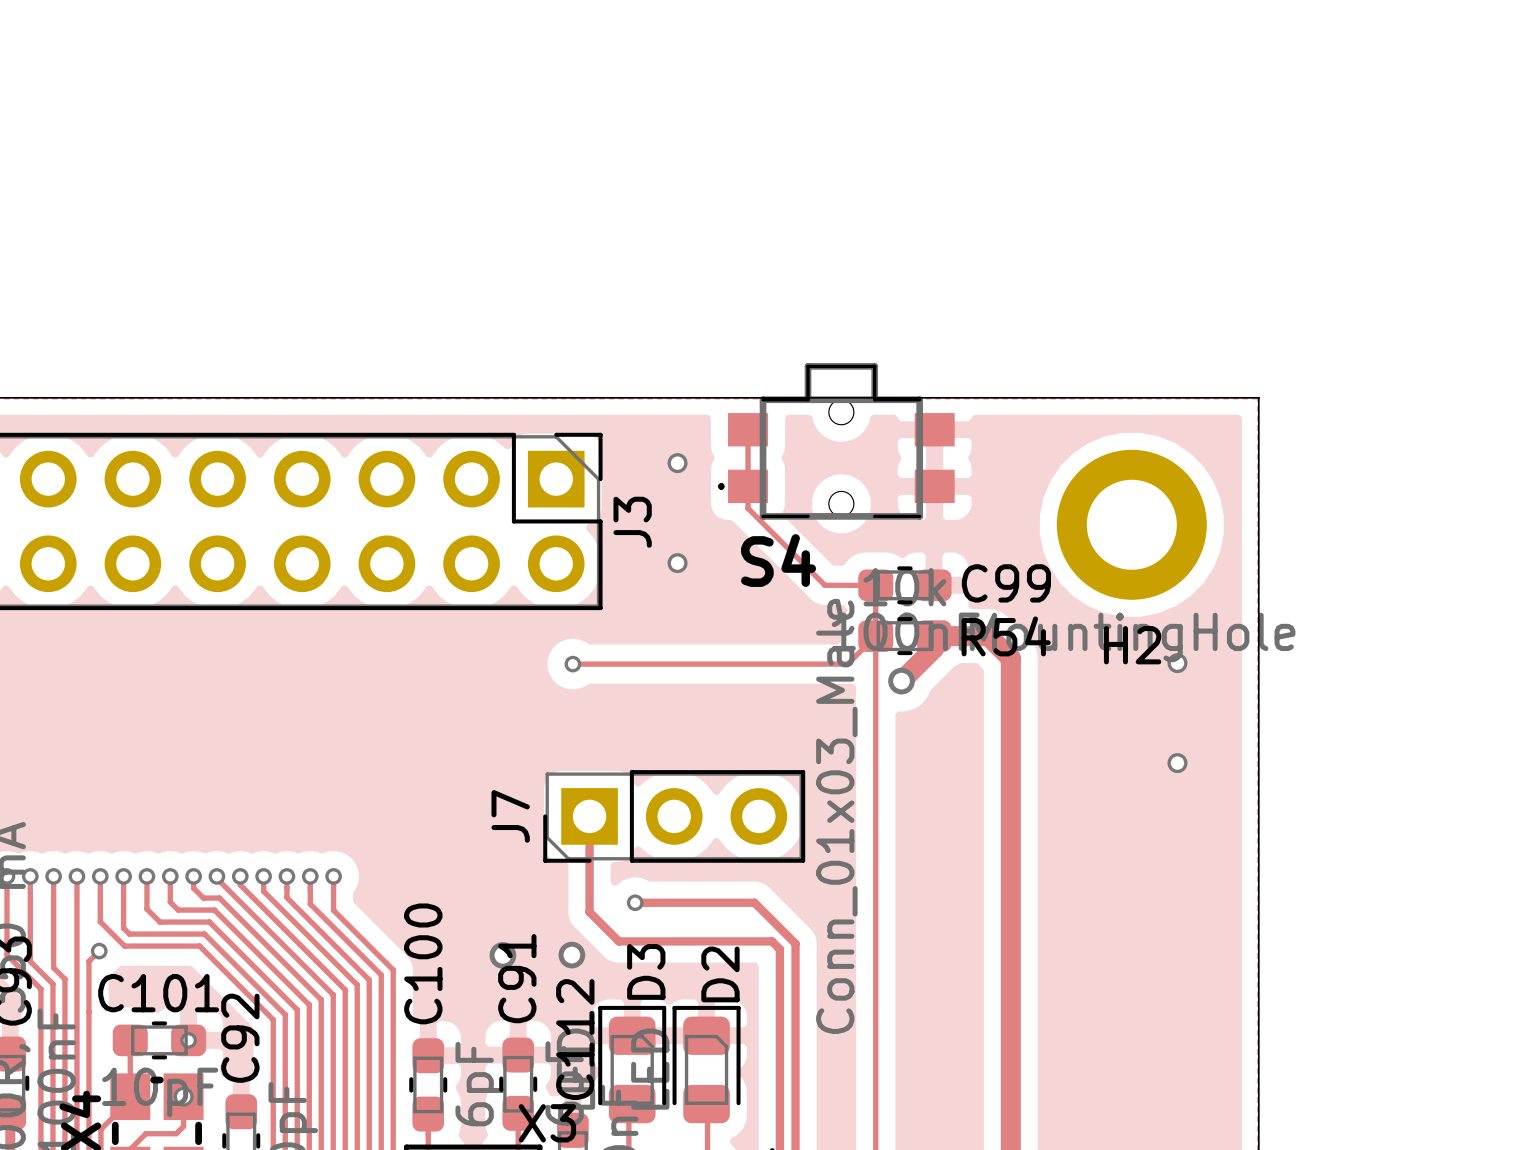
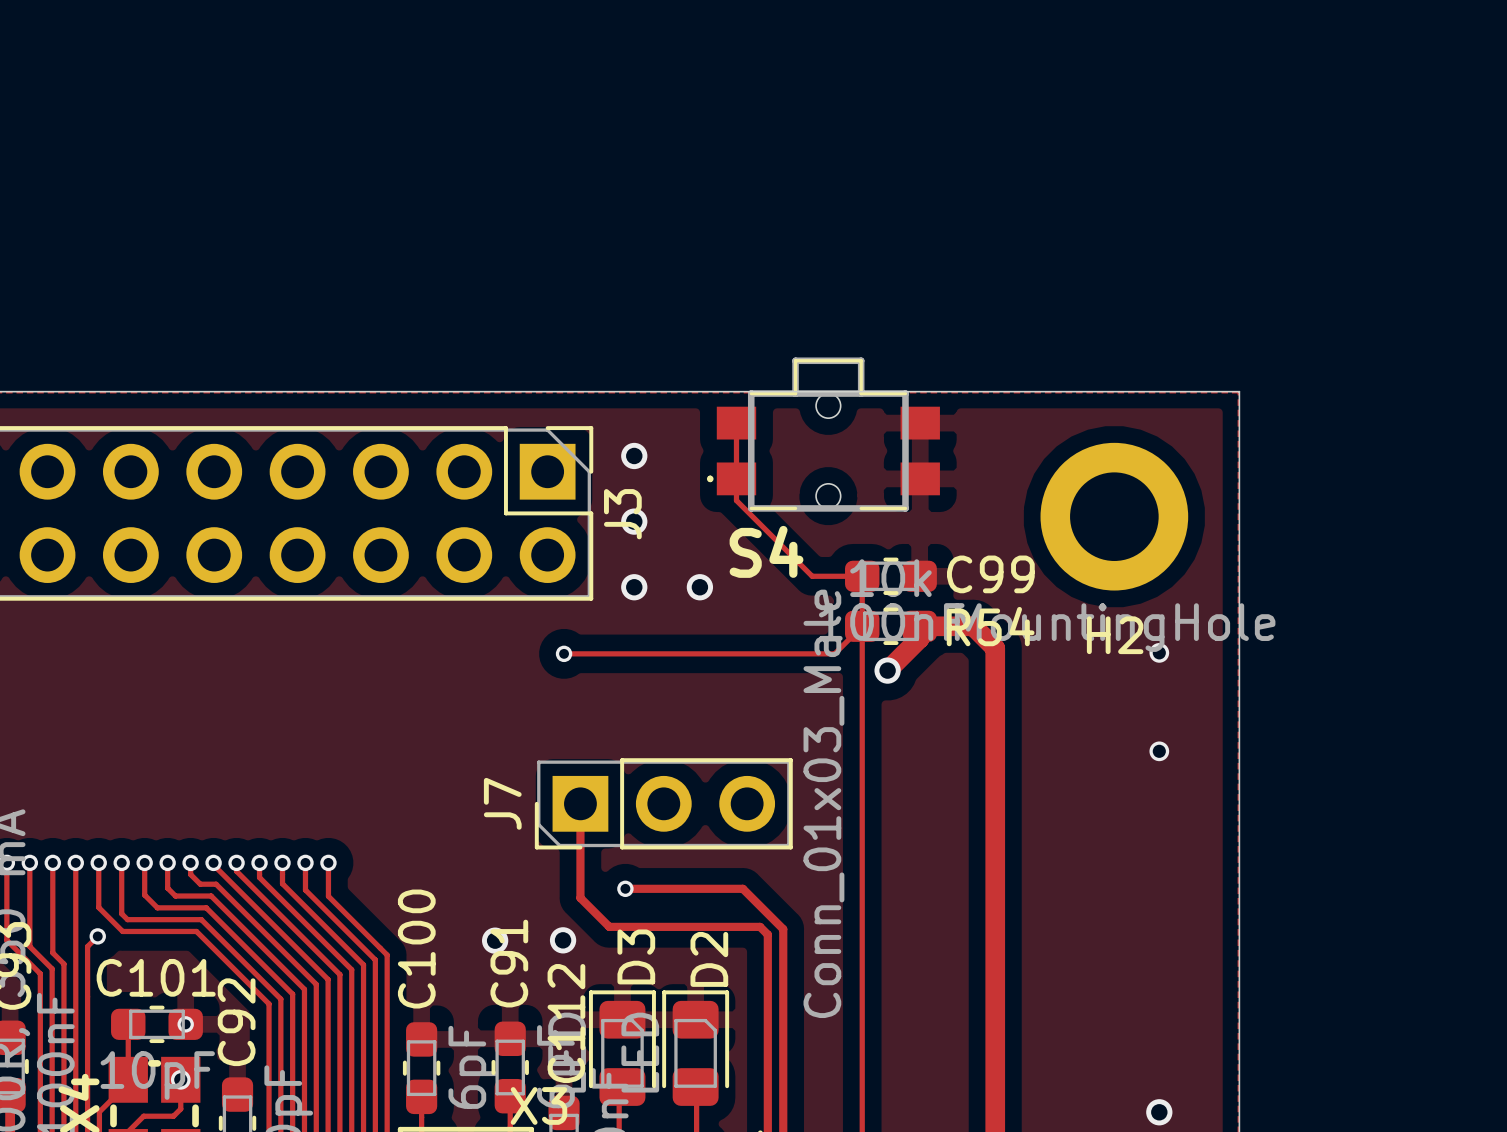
via: none -> (634, 455)
via: (677, 463) -> none
via: none -> (634, 521)
via: (677, 563) -> none
via: none -> (634, 587)
via: none -> (699, 587)
via: none -> (1159, 1112)

